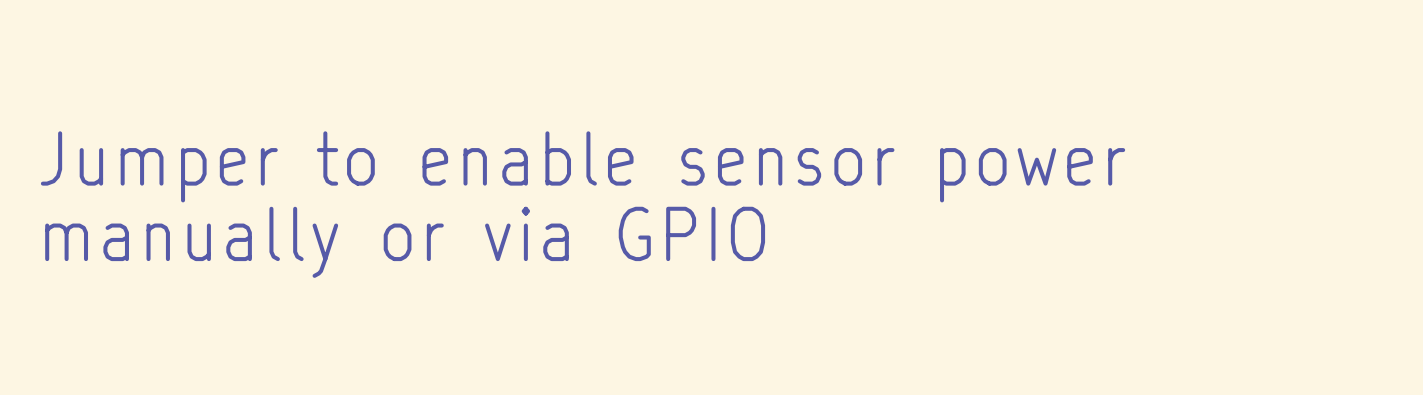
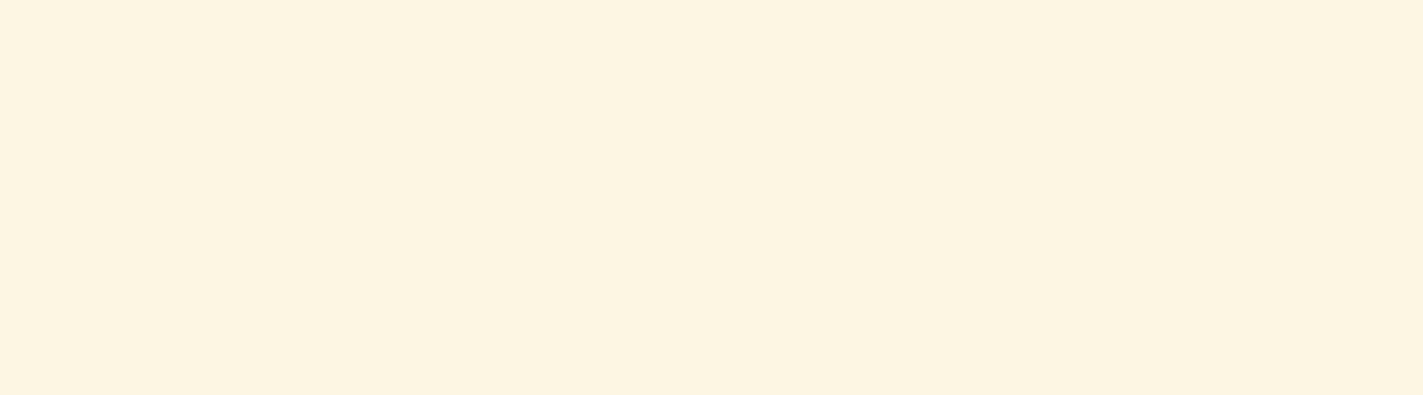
text: Jumper to enable sensor power (583, 166) -> none
text: manually or via GPIO (405, 242) -> none

